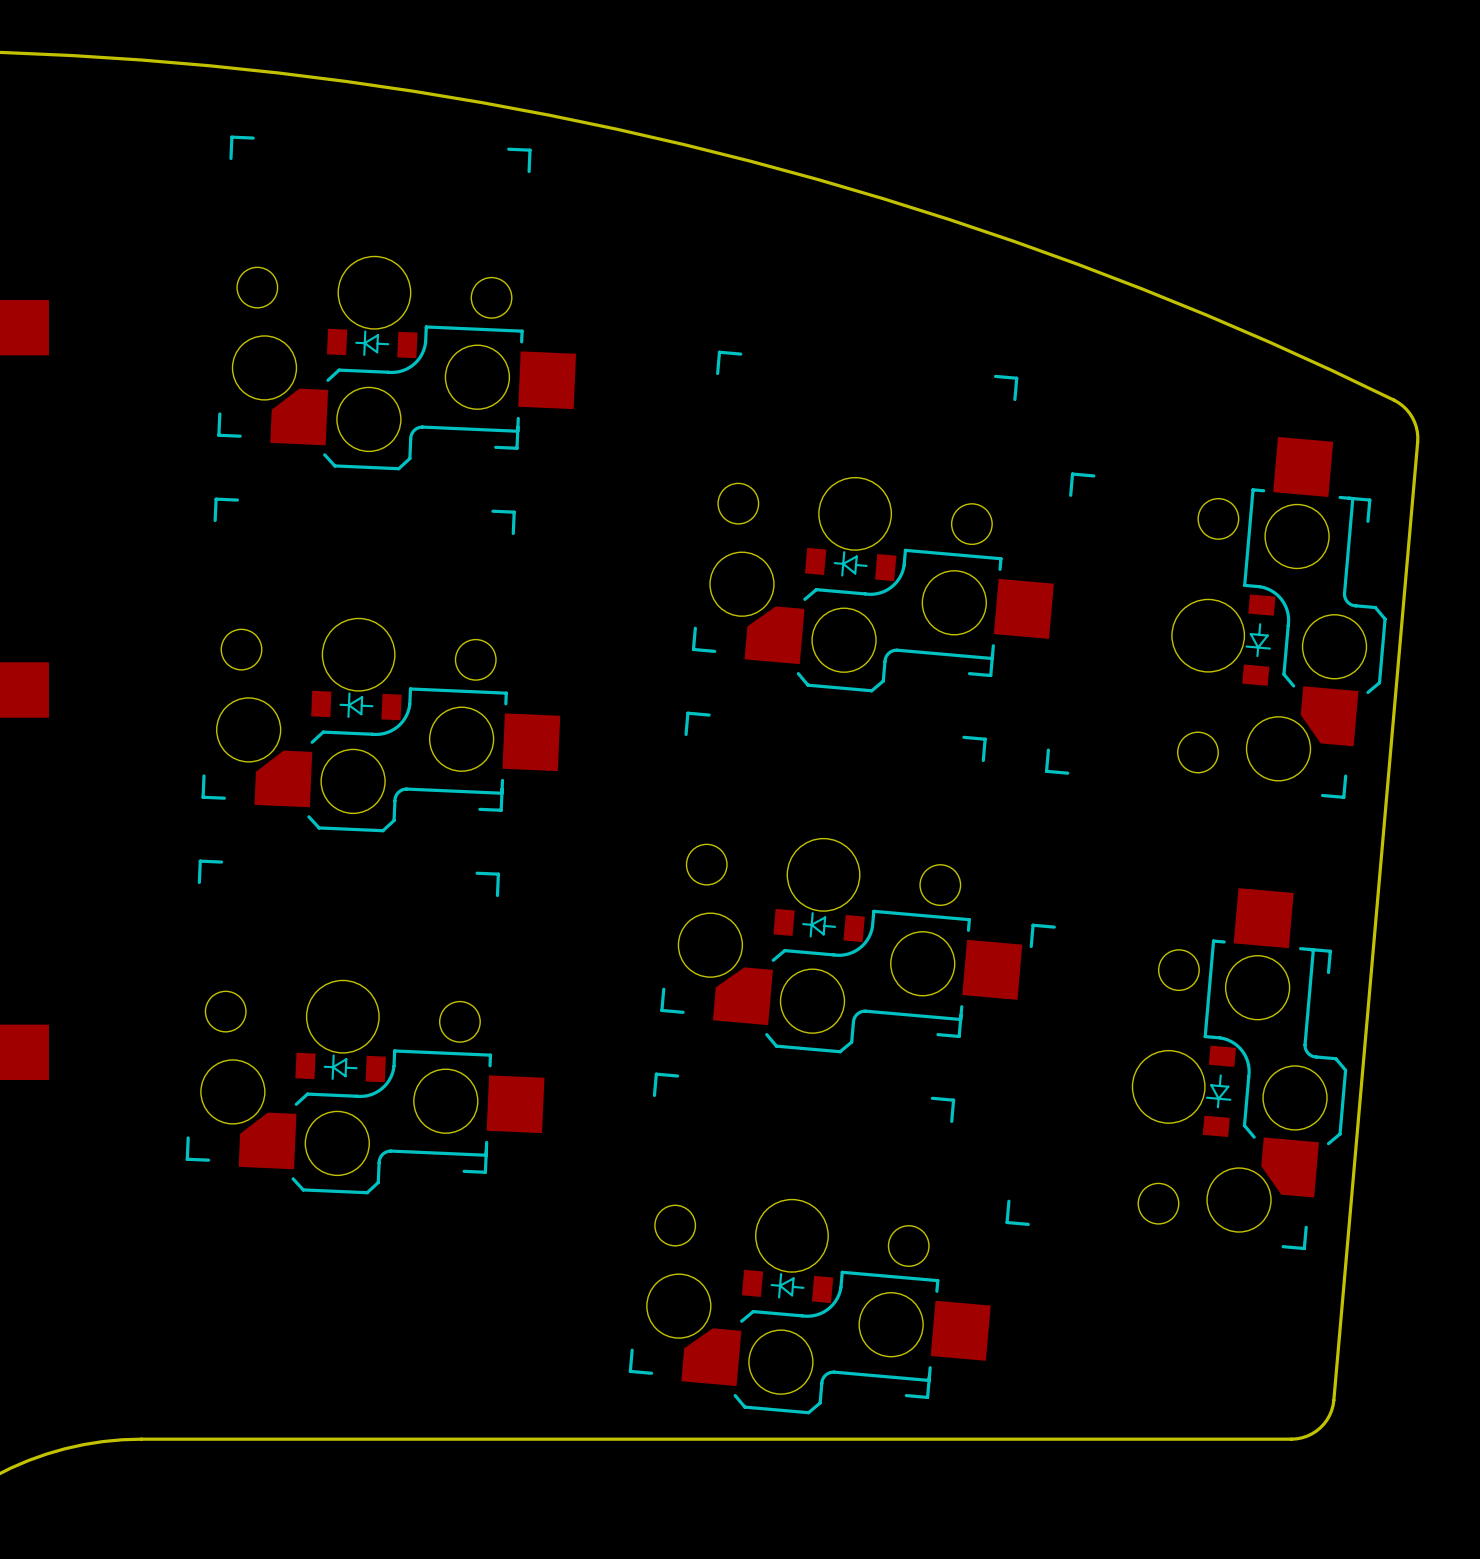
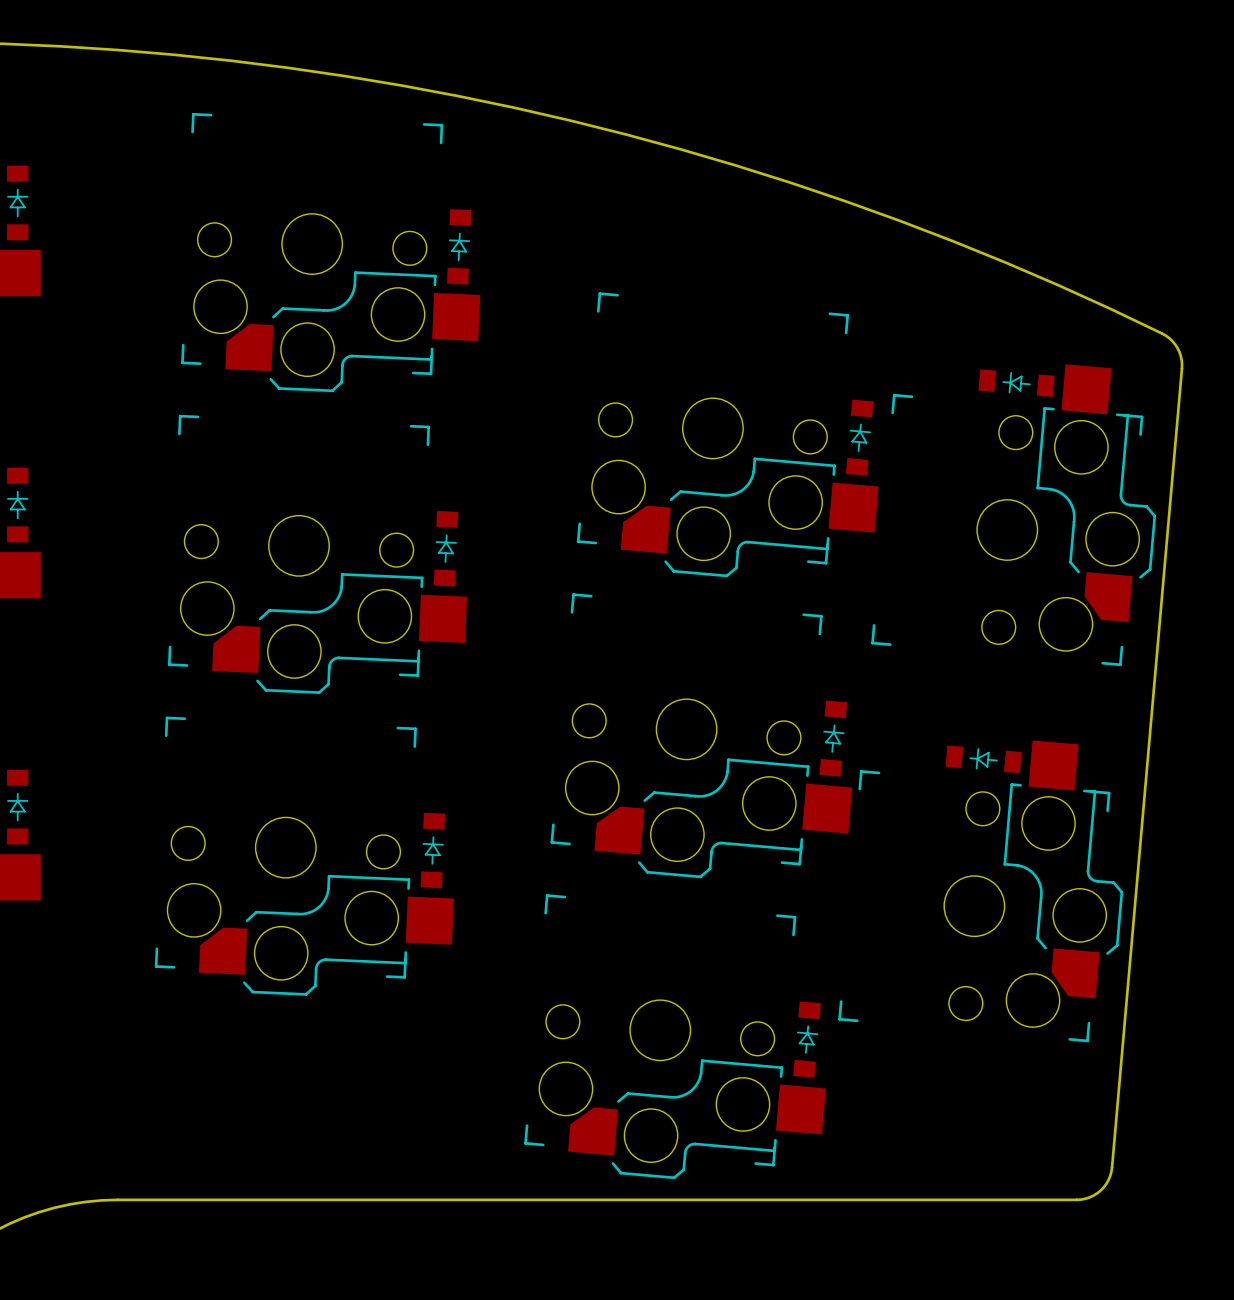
part: none -> (17, 202)
part: none -> (459, 246)
part: (372, 343) -> none
part: none -> (1016, 383)
part: none -> (859, 437)
part: (850, 564) -> none
part: none -> (17, 505)
part: (1258, 640) -> none
part: none -> (446, 548)
part: (356, 705) -> none
part: none -> (833, 738)
part: none -> (983, 759)
part: (819, 925) -> none
part: none -> (17, 807)
part: none -> (432, 850)
part: (340, 1067) -> none
part: (1219, 1091) -> none
part: none -> (807, 1039)
part: (787, 1286) -> none

